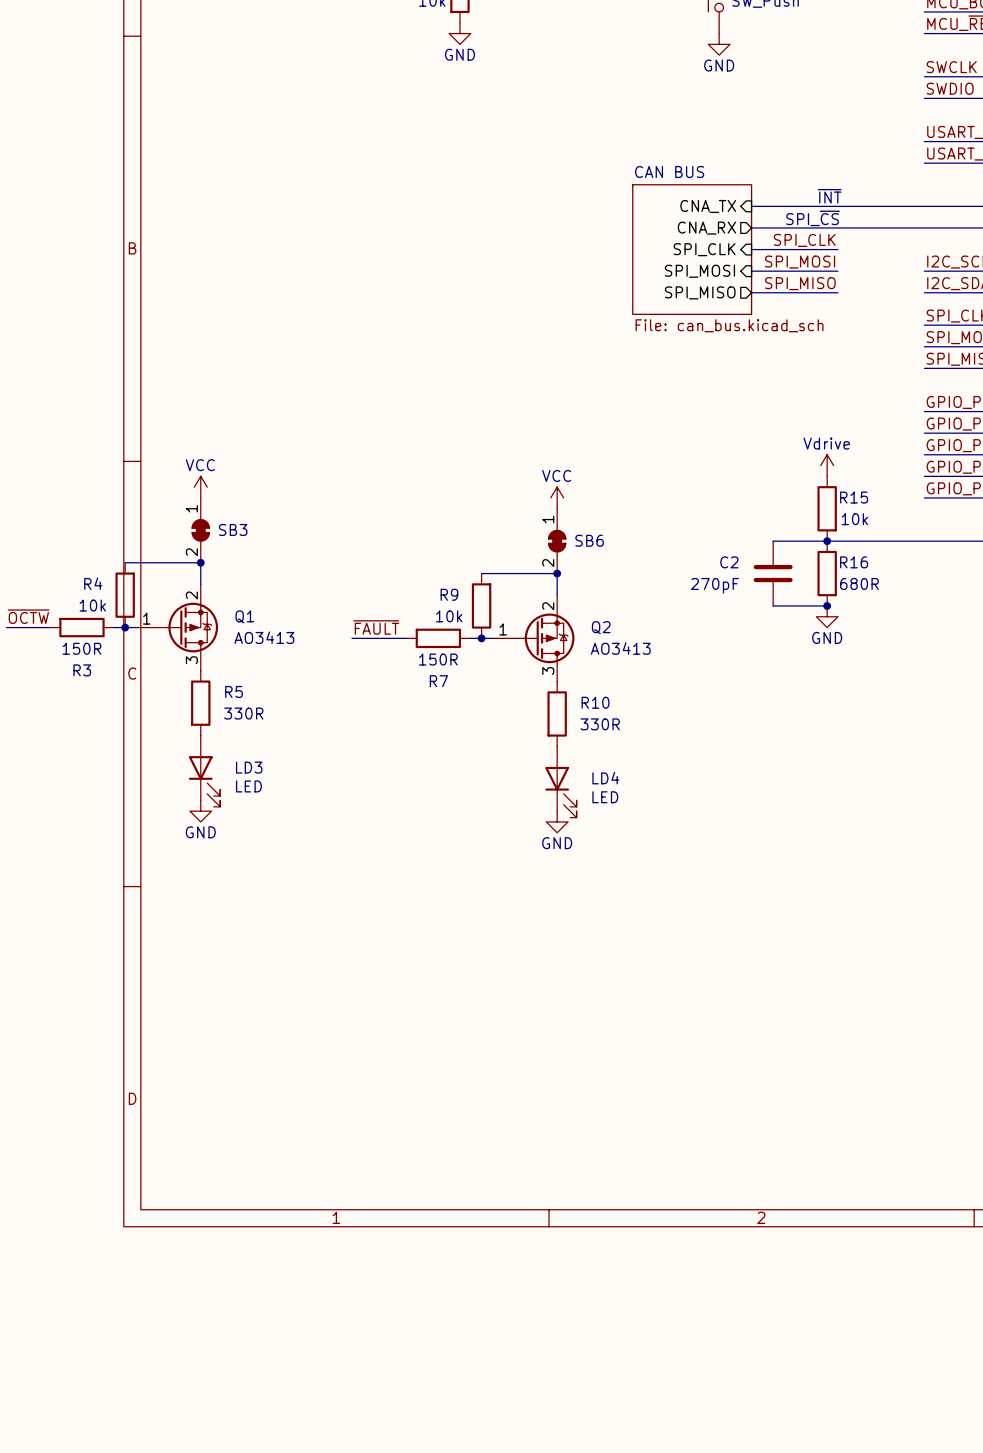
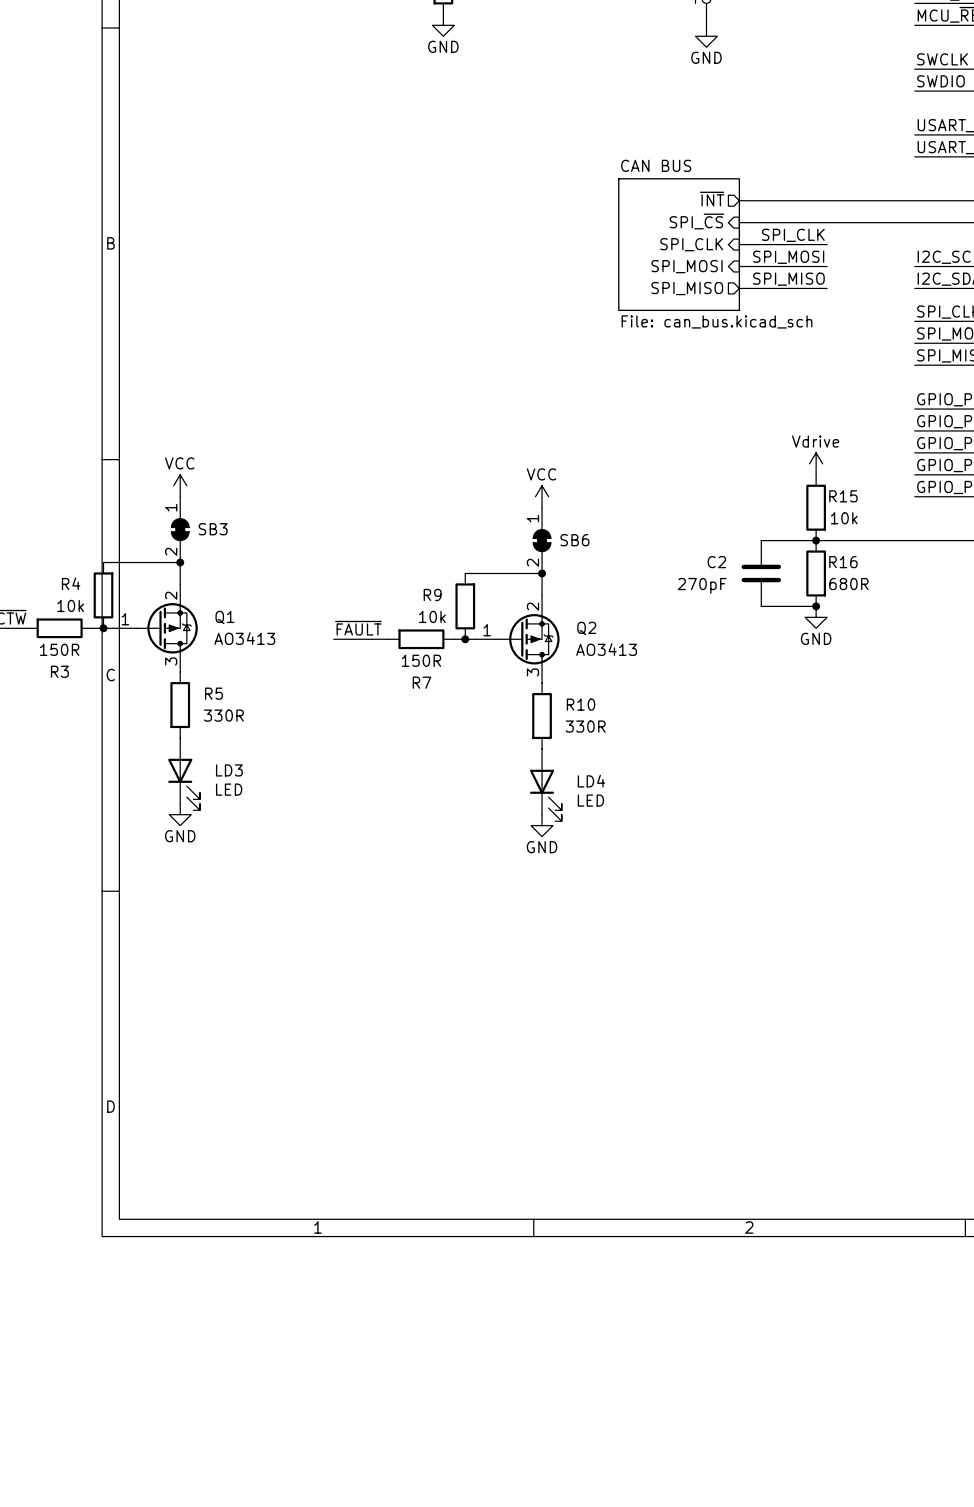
text: ~{INT} (829, 196) -> none
sheet pin shape: input (708, 206) -> output (712, 199)
sheet pin: CNA_TX (708, 206) -> ~{INT} (712, 199)
text: SPI_~{CS} (813, 218) -> none
sheet pin shape: output (706, 228) -> input (696, 221)
sheet pin: CNA_RX (706, 228) -> SPI_~{CS} (696, 221)

